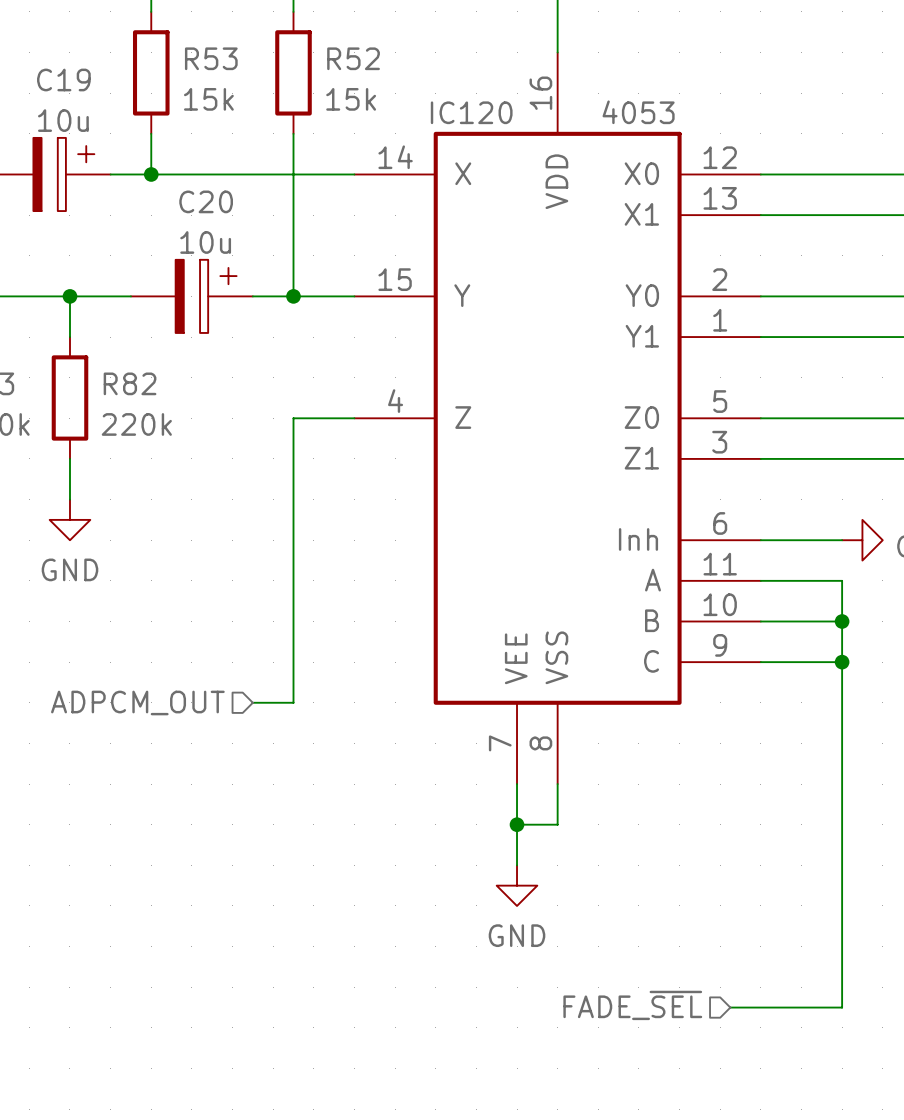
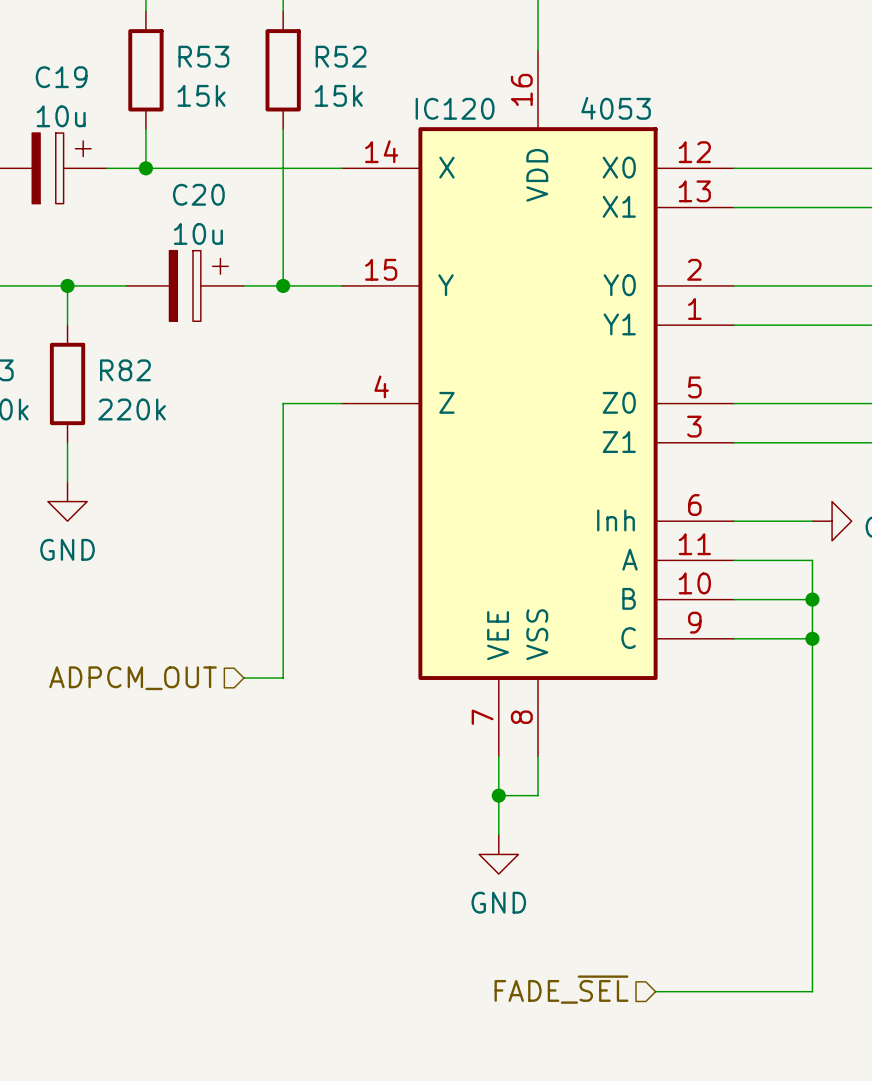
hierarchical label position: FADE_~{SEL} (632, 1005) -> FADE_~{SEL} (561, 989)
wire: (730, 1007) (842, 1007) -> (655, 991) (812, 991) (812, 972)

